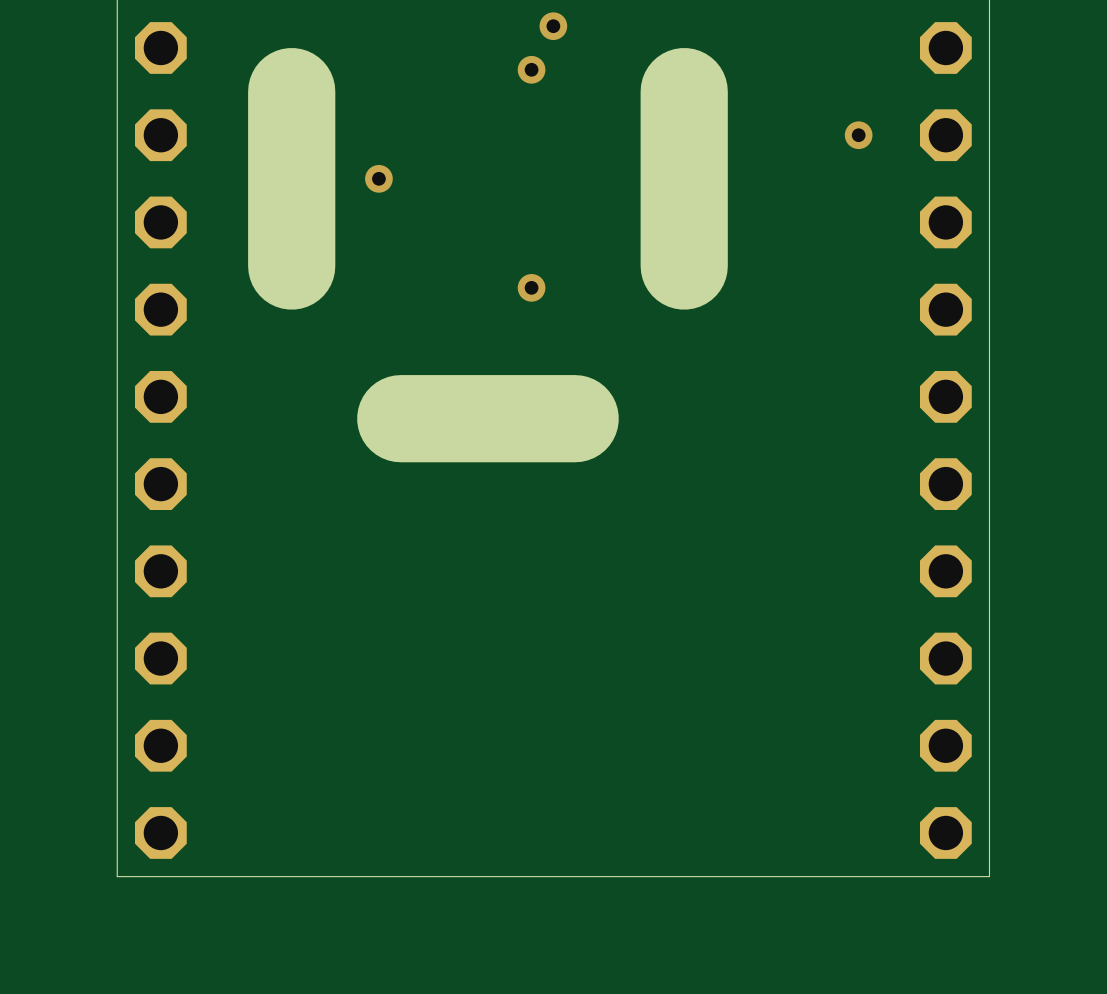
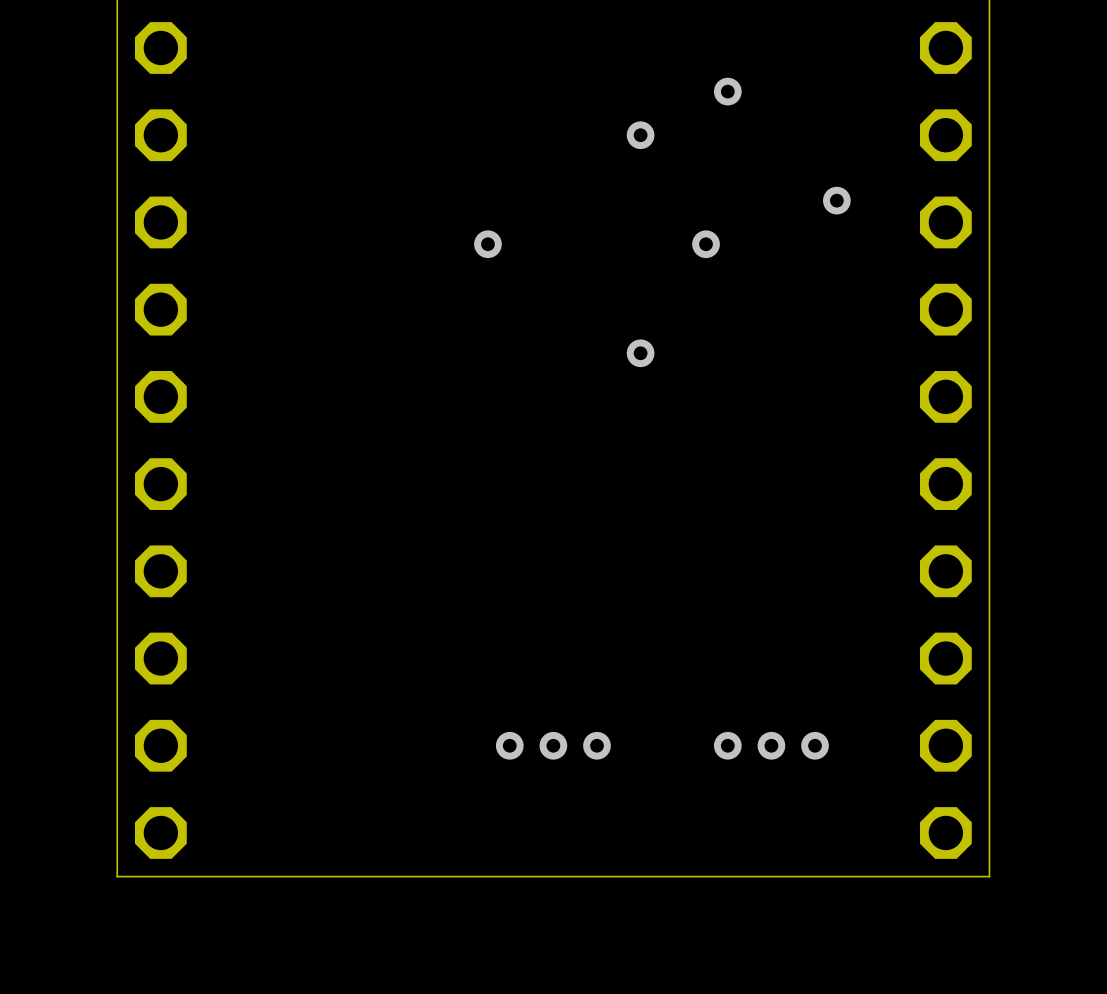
via: (553, 26) -> none
via: (531, 69) -> none
board edge: (291, 91) (291, 266) -> none
board edge: (684, 91) (684, 266) -> none
via: none -> (727, 91)
via: none -> (640, 135)
via: (858, 135) -> none
via: (378, 178) -> none
via: none -> (836, 200)
via: none -> (706, 244)
via position: (531, 287) -> (487, 244)
via: none -> (640, 353)
board edge: (575, 418) (400, 418) -> none
via: none -> (509, 745)
via: none -> (553, 745)
via: none -> (596, 745)
via: none -> (727, 745)
via: none -> (771, 745)
via: none -> (815, 745)

